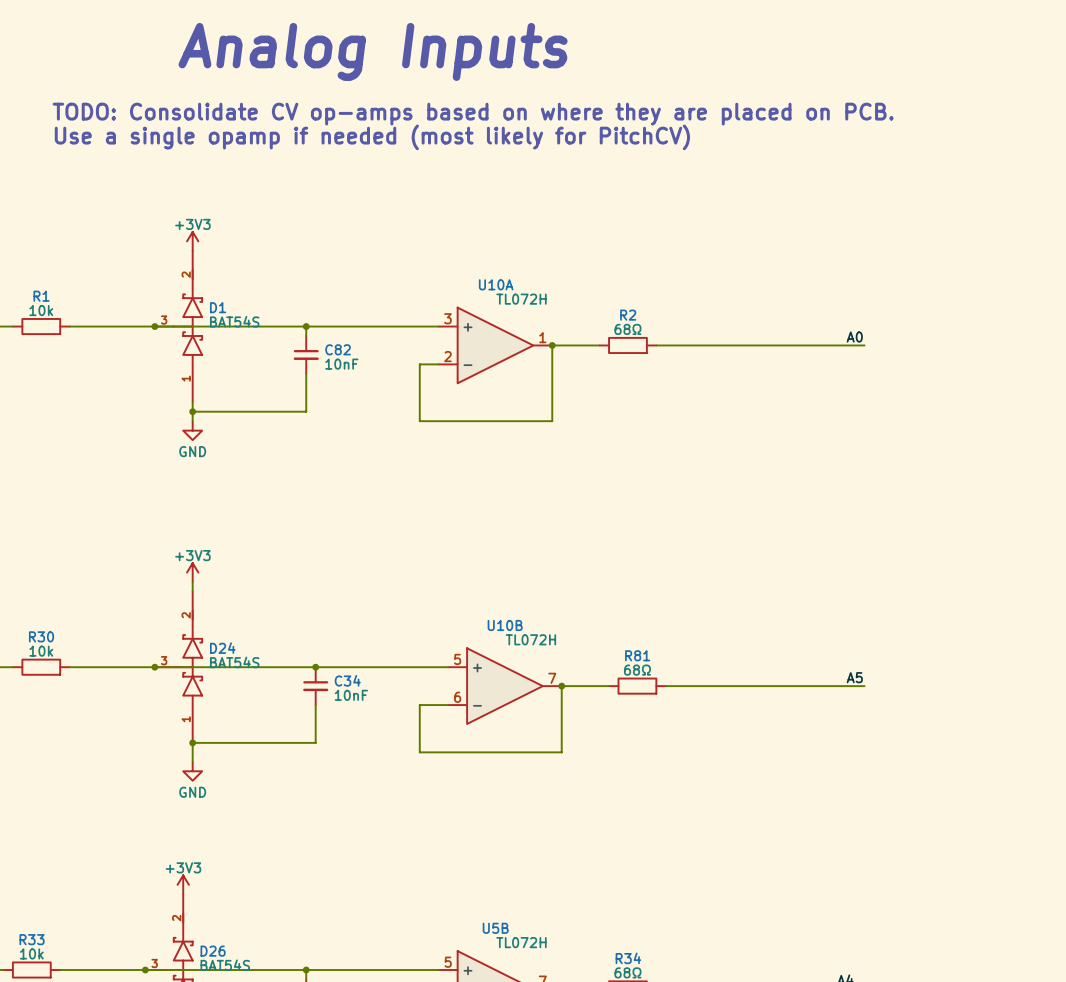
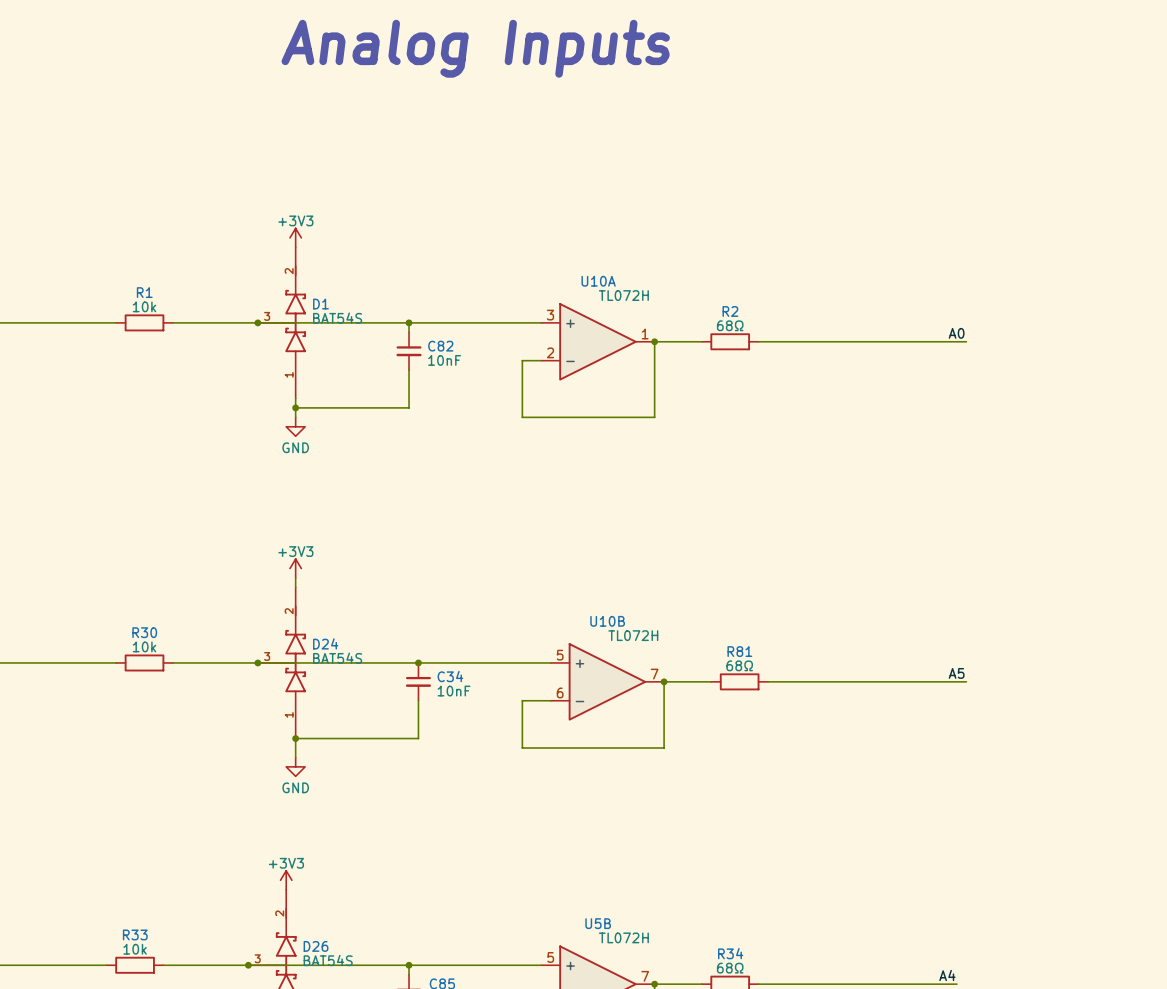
text: TODO: Consolidate CV op-amps based on where they are placed on PCB. (473, 114) -> none
text: Use a single opamp if needed (most likely for PitchCV) (372, 137) -> none

